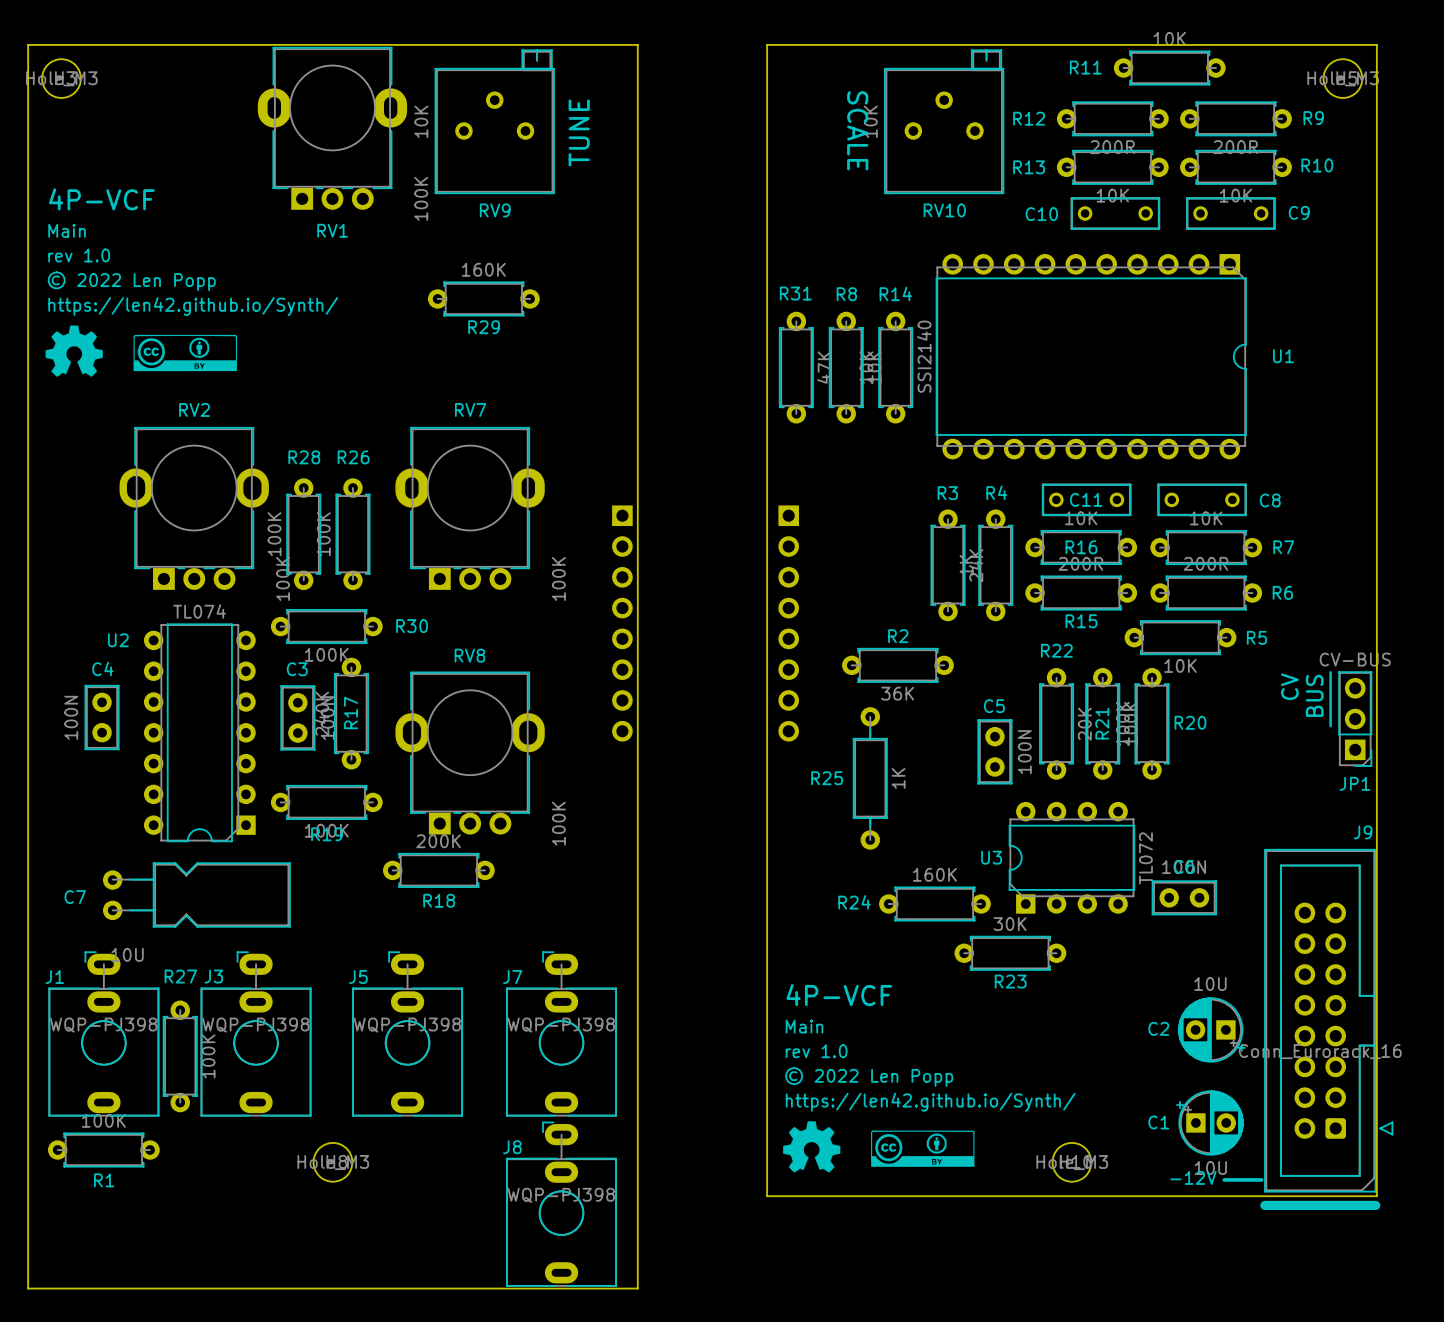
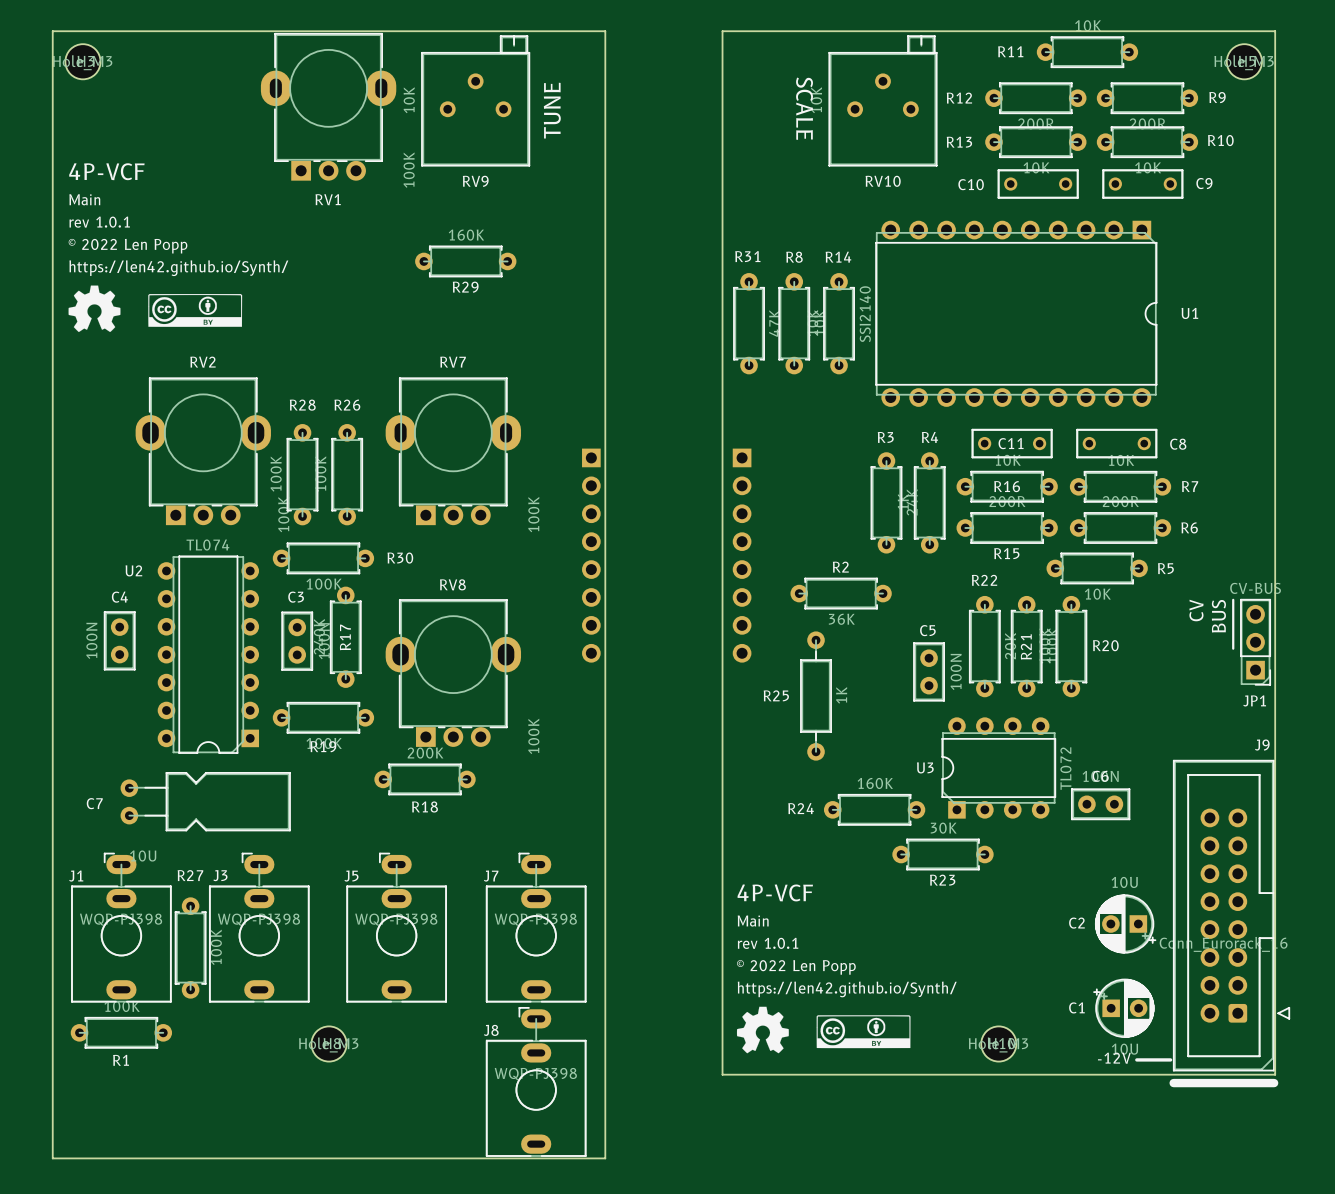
text: rev 1.0 (79, 255) -> rev 1.0.1 (99, 222)
text: rev 1.0 (816, 1051) -> rev 1.0.1 (768, 943)

